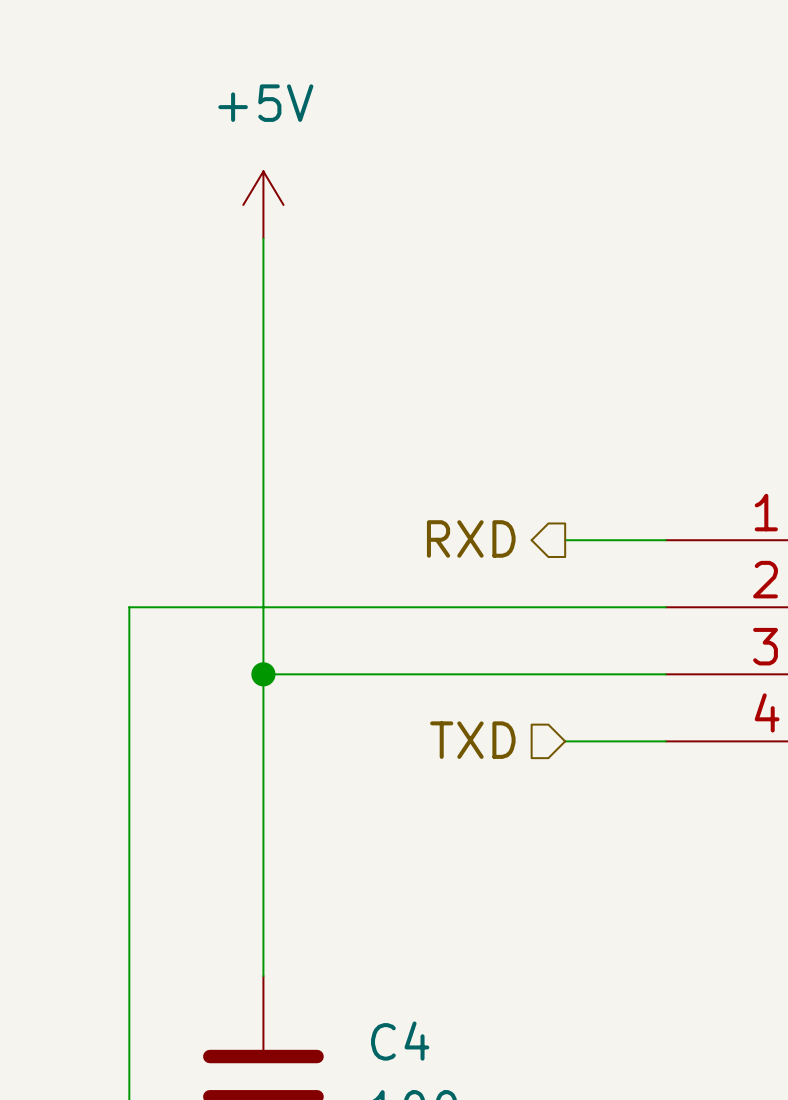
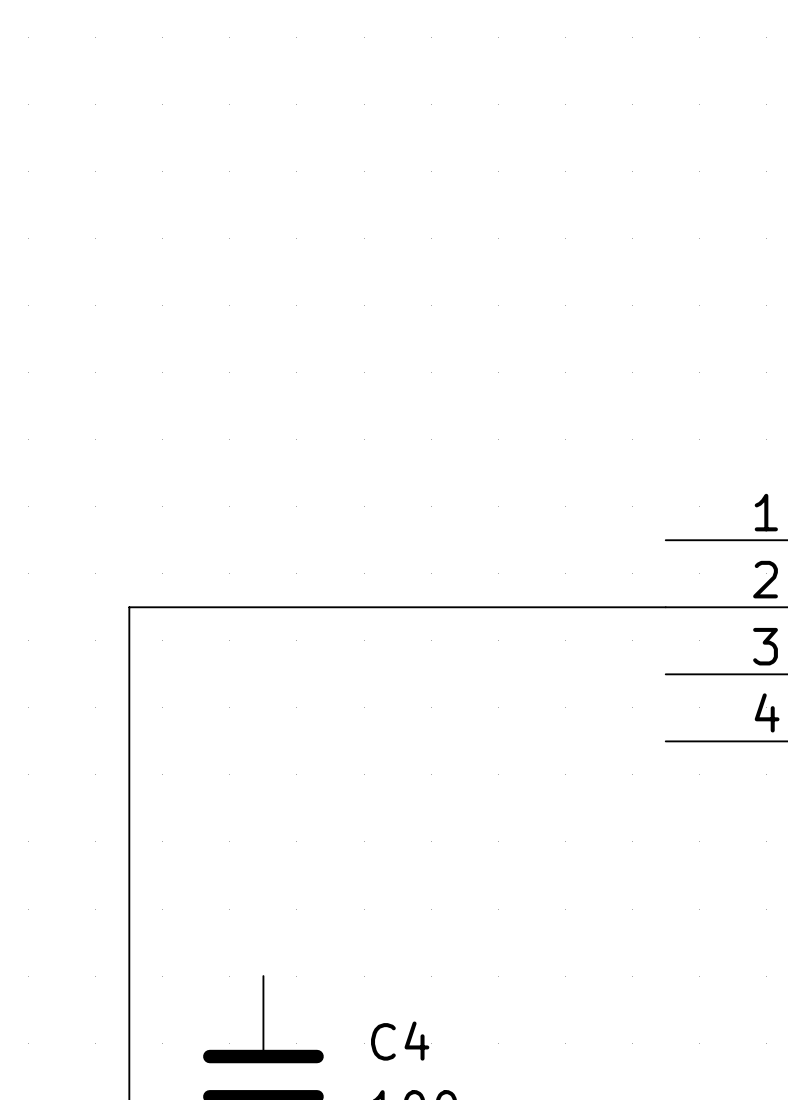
power symbol: +5V (263, 204) -> none
wire: (263, 238) (263, 976) -> none
hierarchical label: RXD (471, 538) -> none
wire: (565, 540) (665, 540) -> none
wire: (263, 674) (665, 674) -> none
junction: (263, 674) -> none
hierarchical label: TXD (472, 740) -> none
wire: (565, 741) (665, 741) -> none

